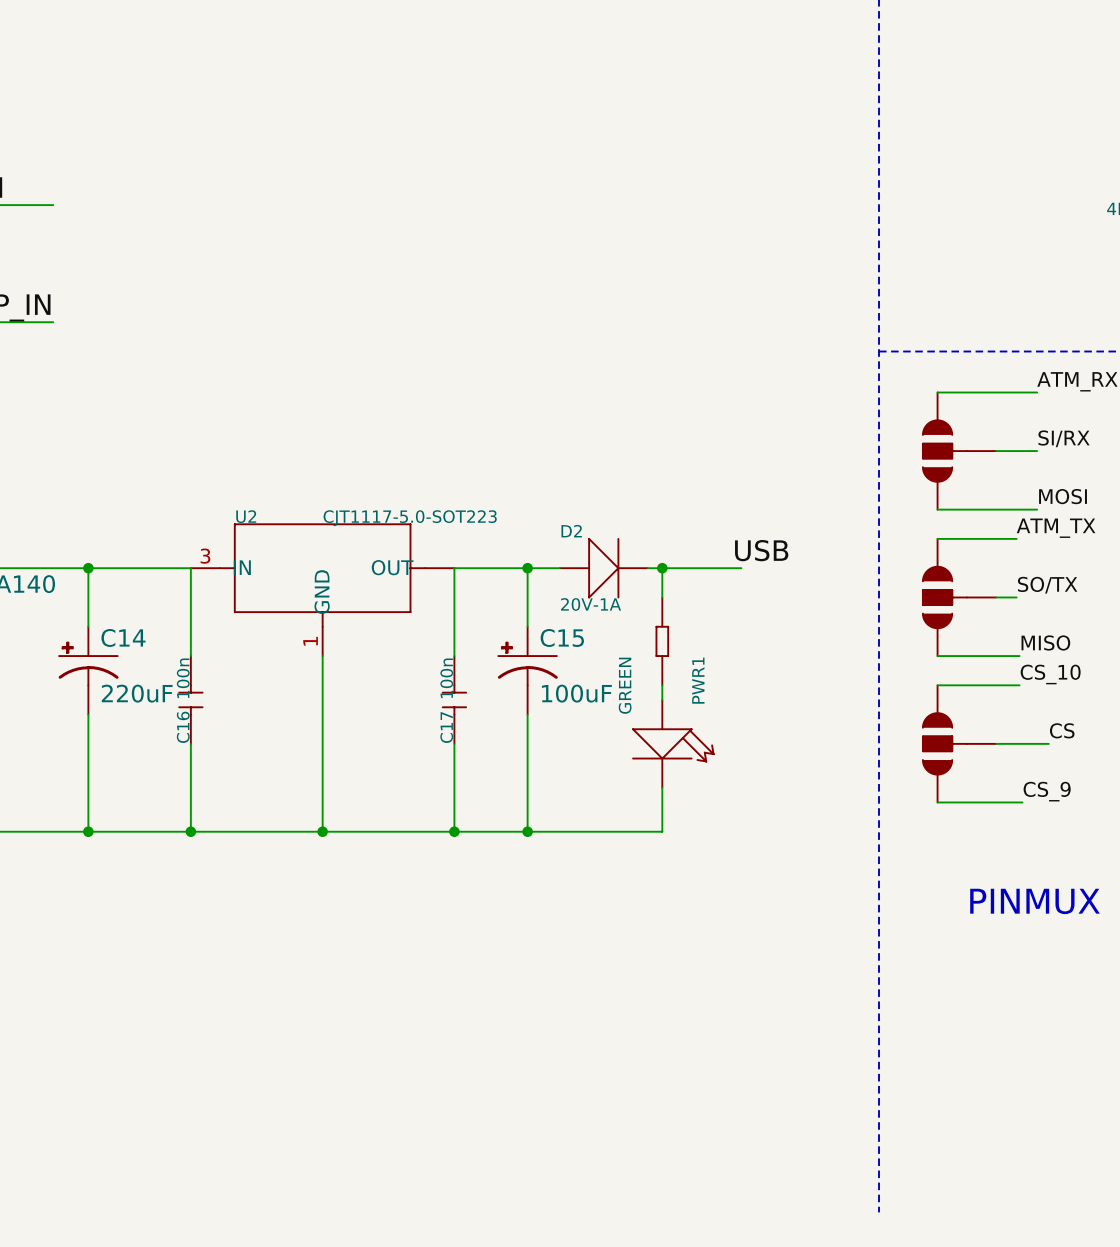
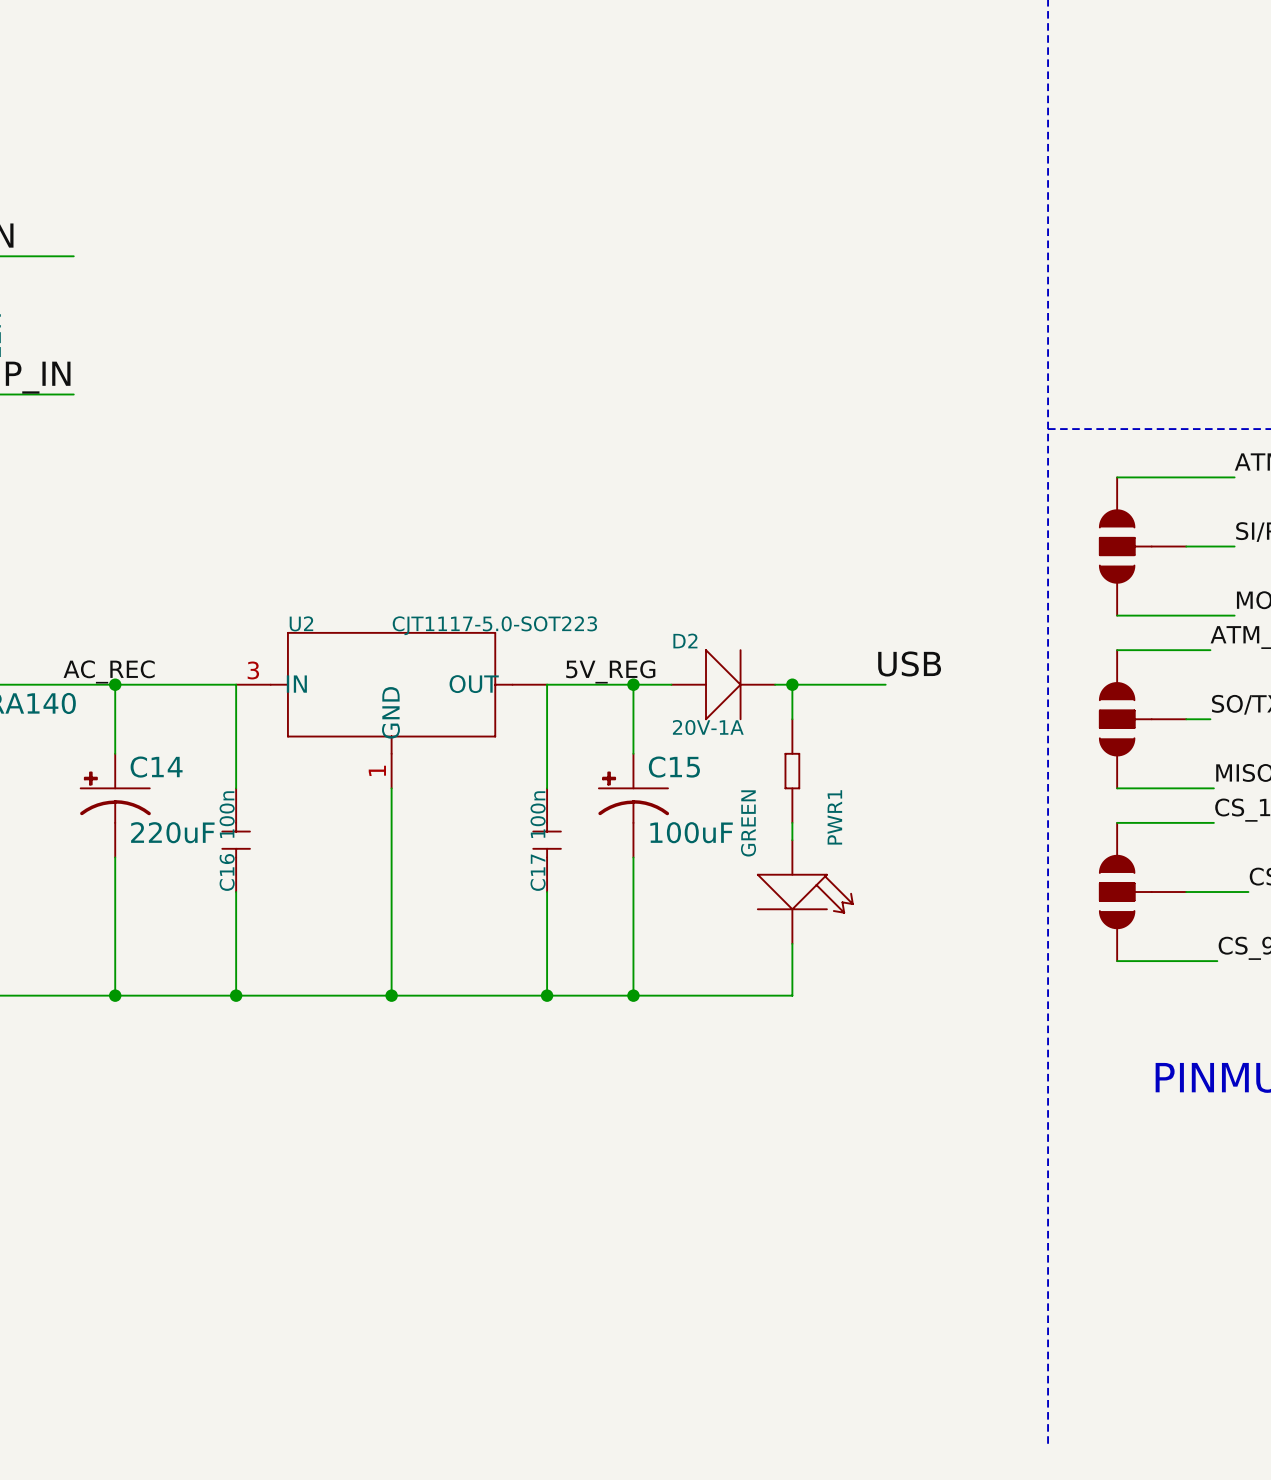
label: none -> AC_REC (109, 671)
label: none -> 5V_REG (610, 671)

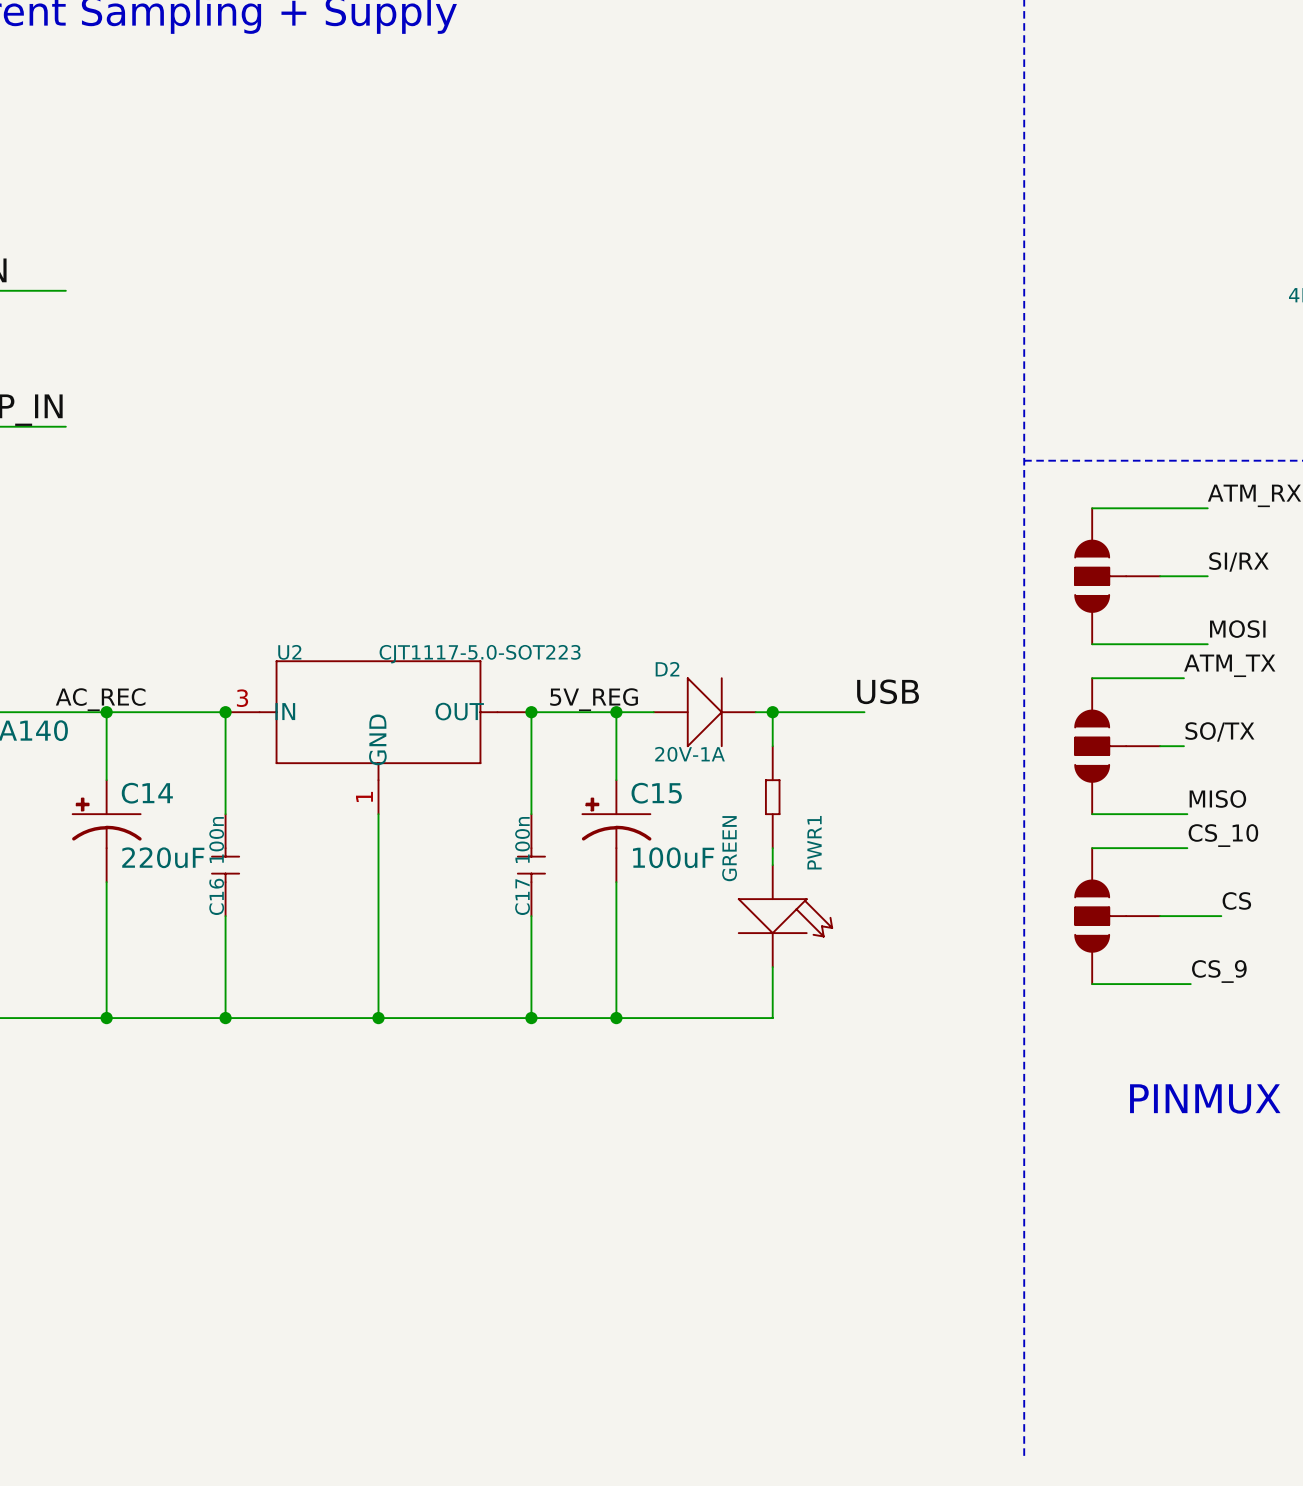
junction: none -> (225, 712)
junction: none -> (531, 712)

